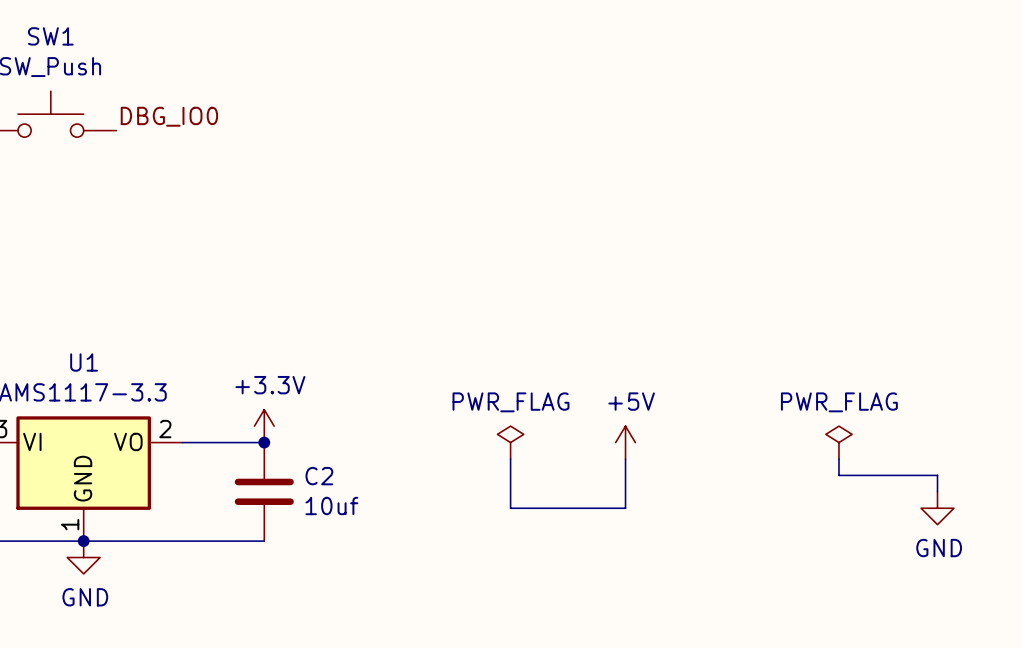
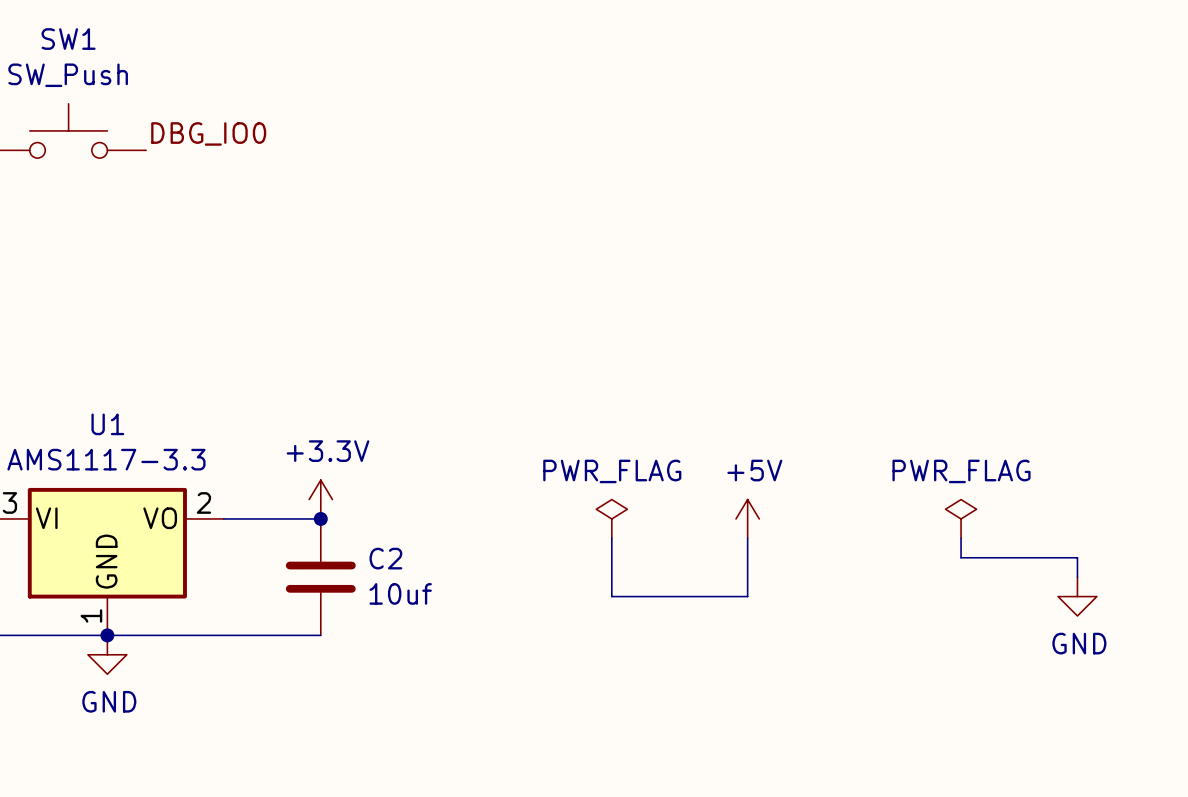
power symbol position: PWR_FLAG (838, 442) -> PWR_FLAG (961, 518)
wire: (838, 459) (838, 475) -> (961, 538) (961, 557) (999, 557)
wire: (904, 475) (937, 475) (937, 491) -> (1077, 557) (1077, 577)
power symbol position: GND (937, 508) -> GND (1077, 596)

